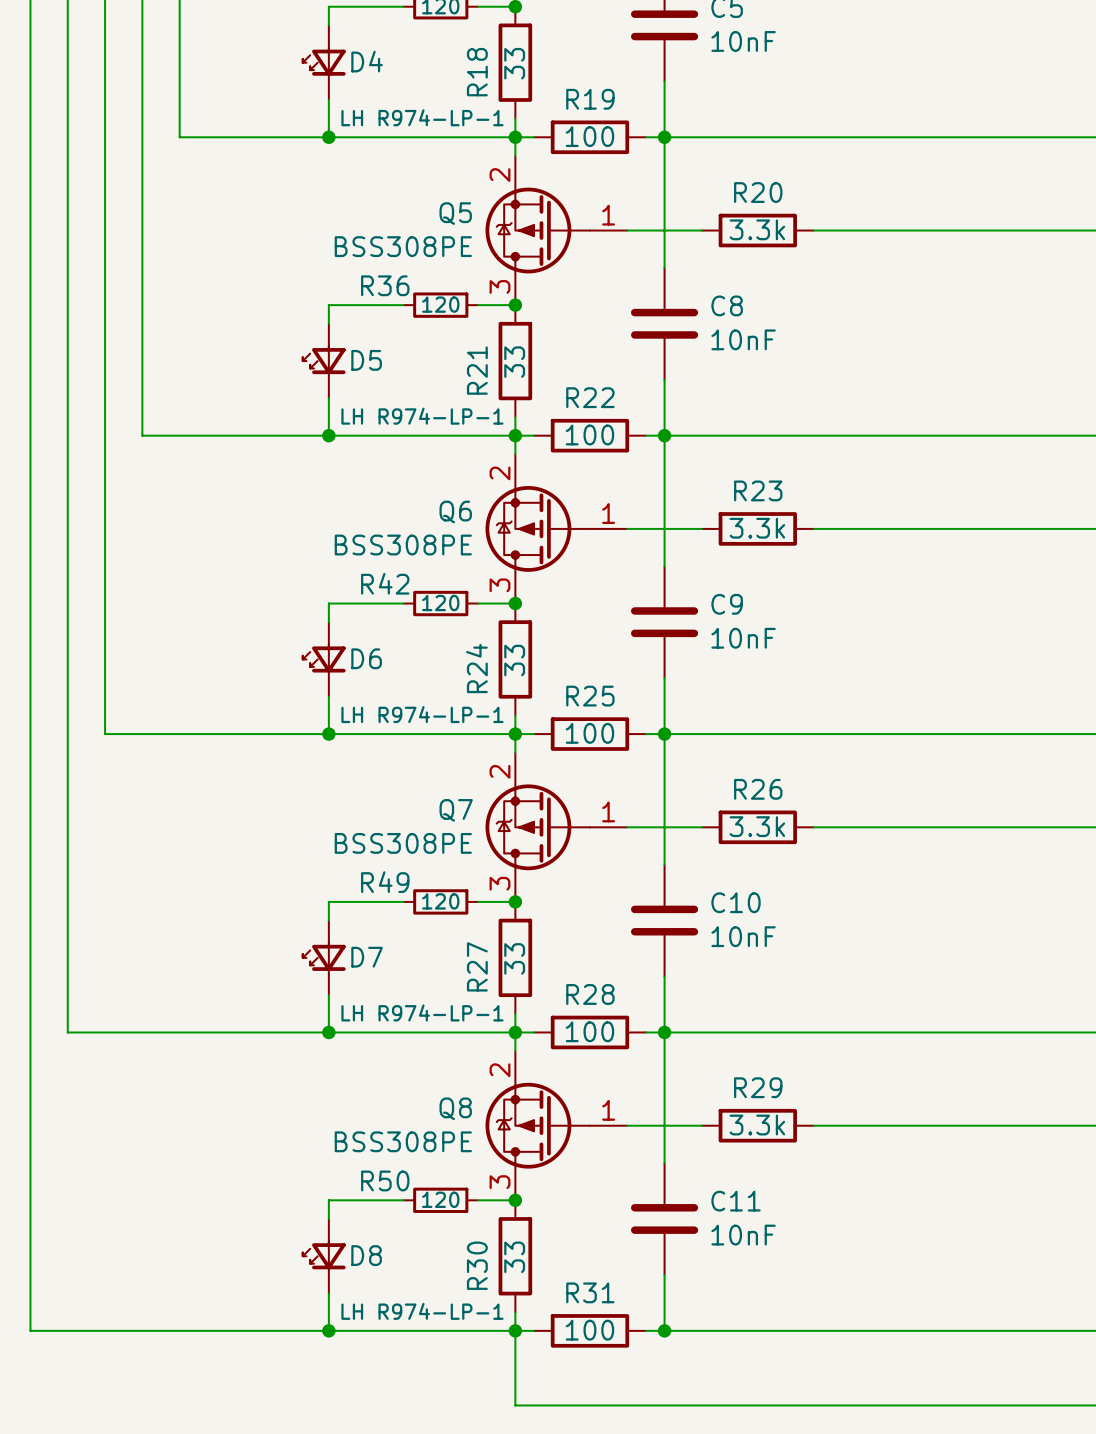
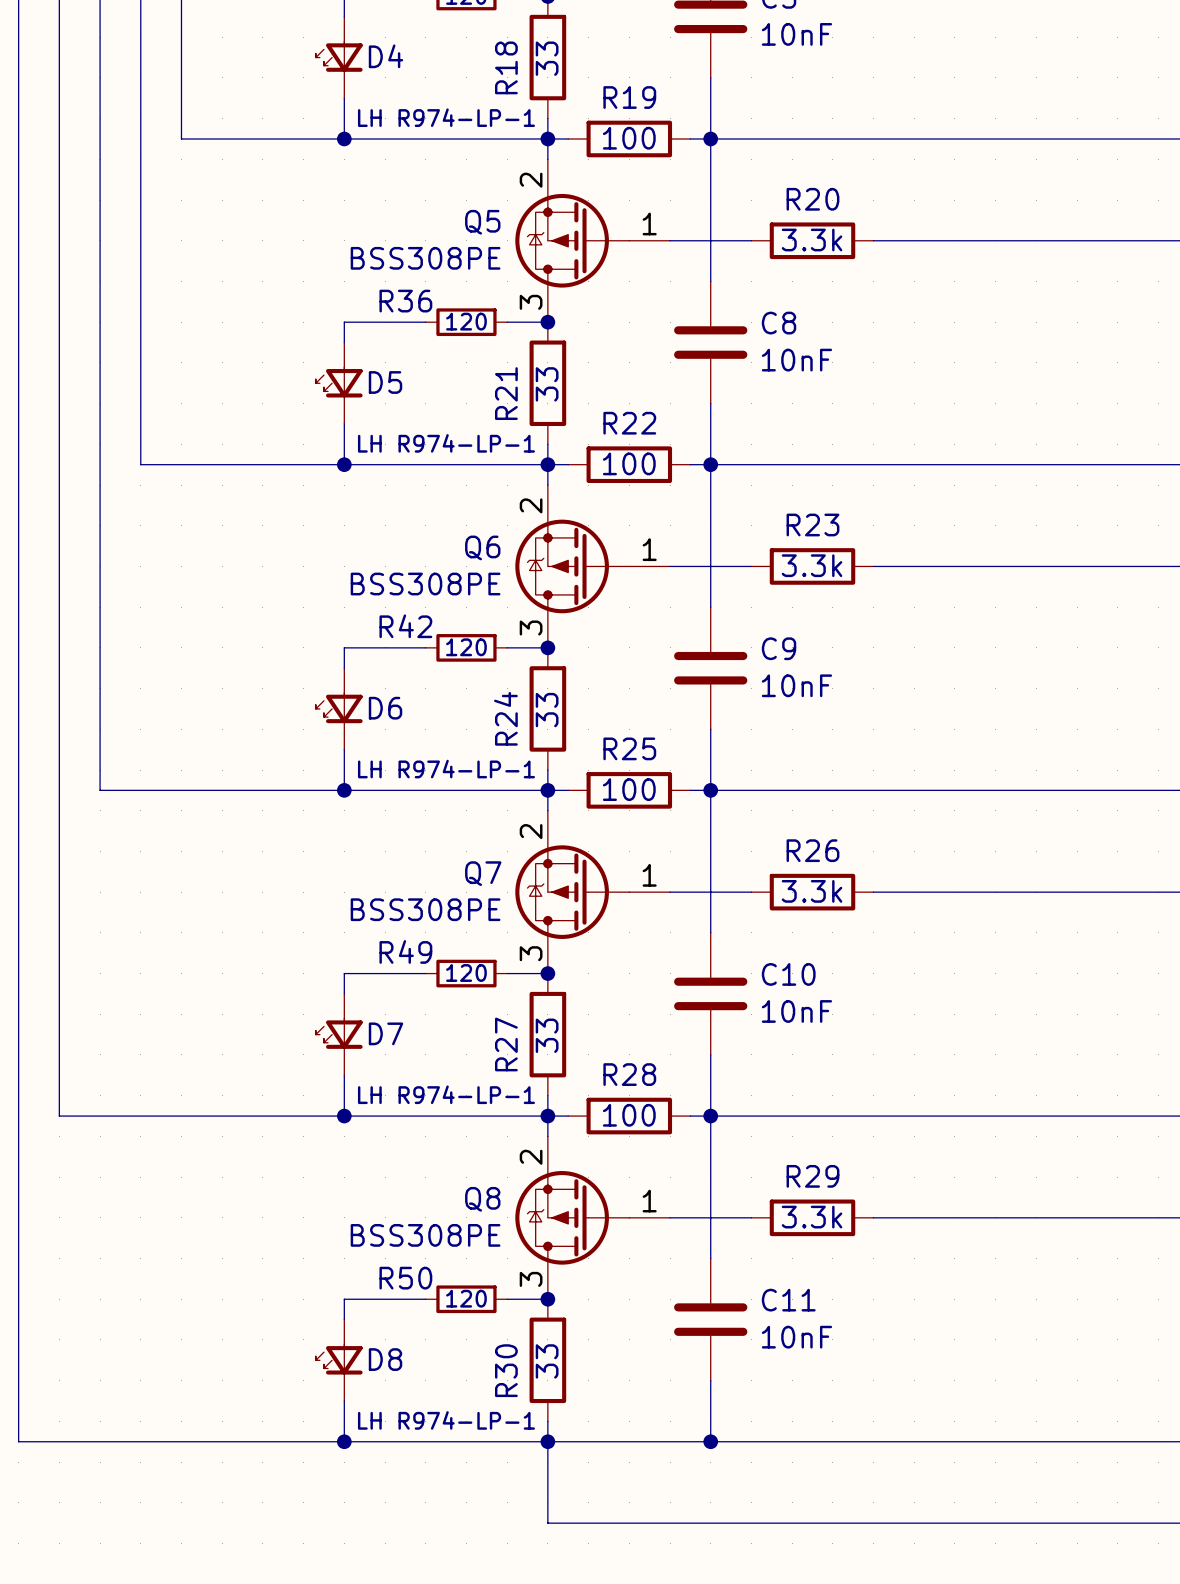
wire: none -> (568, 1441) (690, 1441)
R31: 100 (589, 1330) -> none

